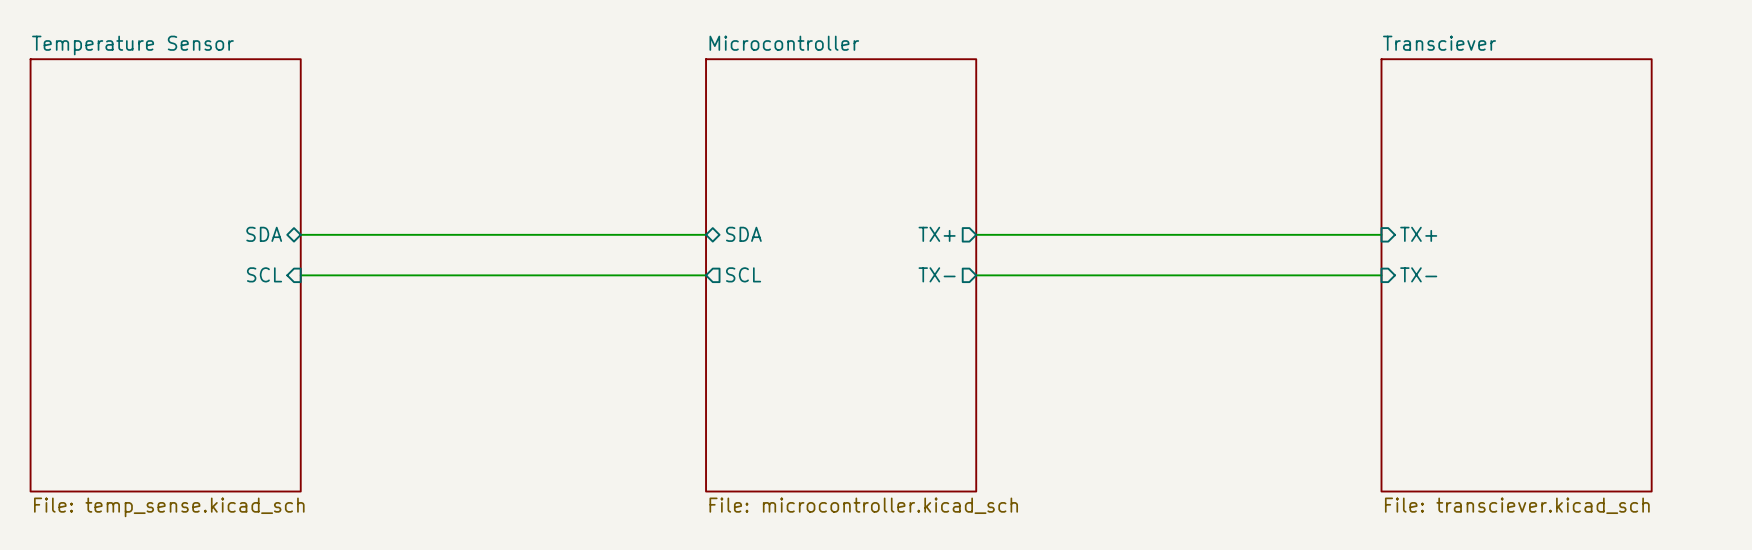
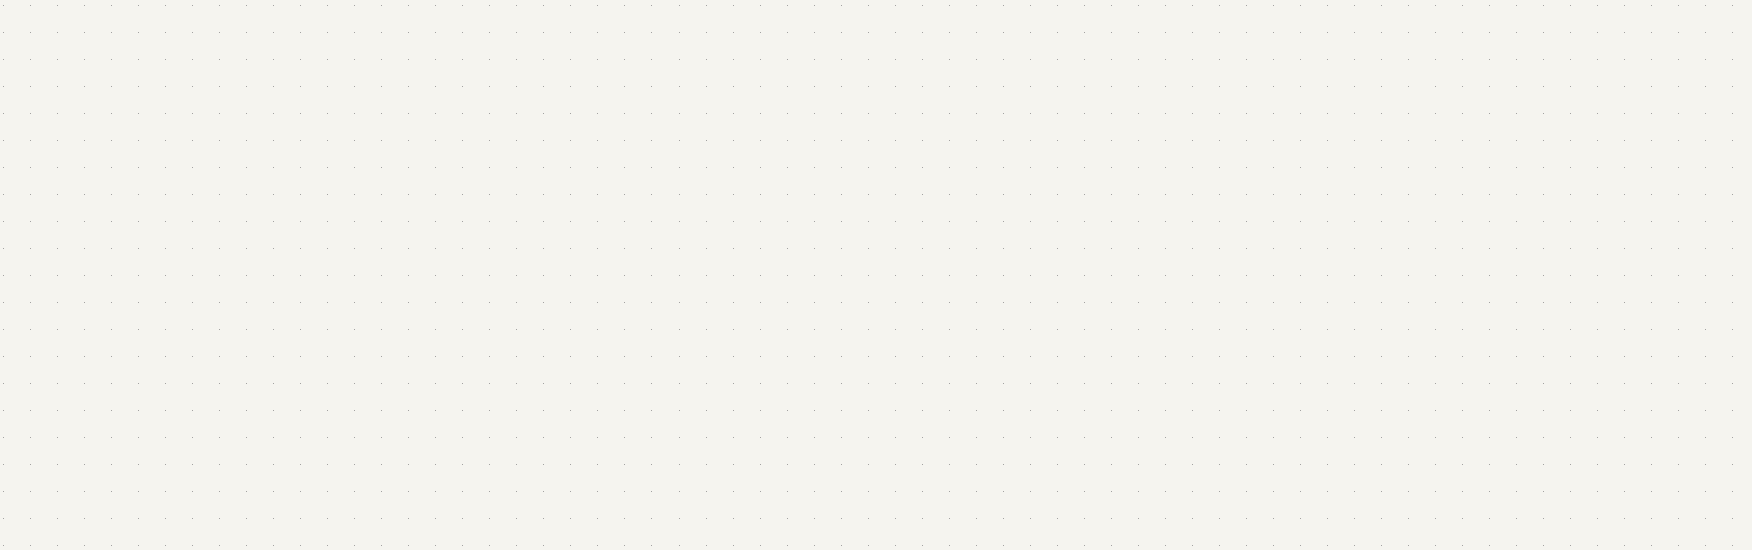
sheet pin: SDA (264, 234) -> none
wire: (300, 234) (706, 234) -> none
sheet pin: SDA (743, 234) -> none
sheet pin: TX+ (937, 234) -> none
wire: (976, 234) (1381, 234) -> none
sheet pin: TX+ (1418, 234) -> none
sheet pin: SCL (264, 274) -> none
sheet pin: SCL (743, 274) -> none
sheet pin: TX- (937, 274) -> none
sheet pin: TX- (1418, 274) -> none
sheet Temperature Sensor: File: temp_sense.kicad_sch (165, 275) -> none
wire: (300, 275) (706, 275) -> none
sheet Microcontroller: File: microcontroller.kicad_sch (841, 275) -> none
wire: (976, 275) (1381, 275) -> none
sheet Transciever: File: transciever.kicad_sch (1516, 275) -> none

